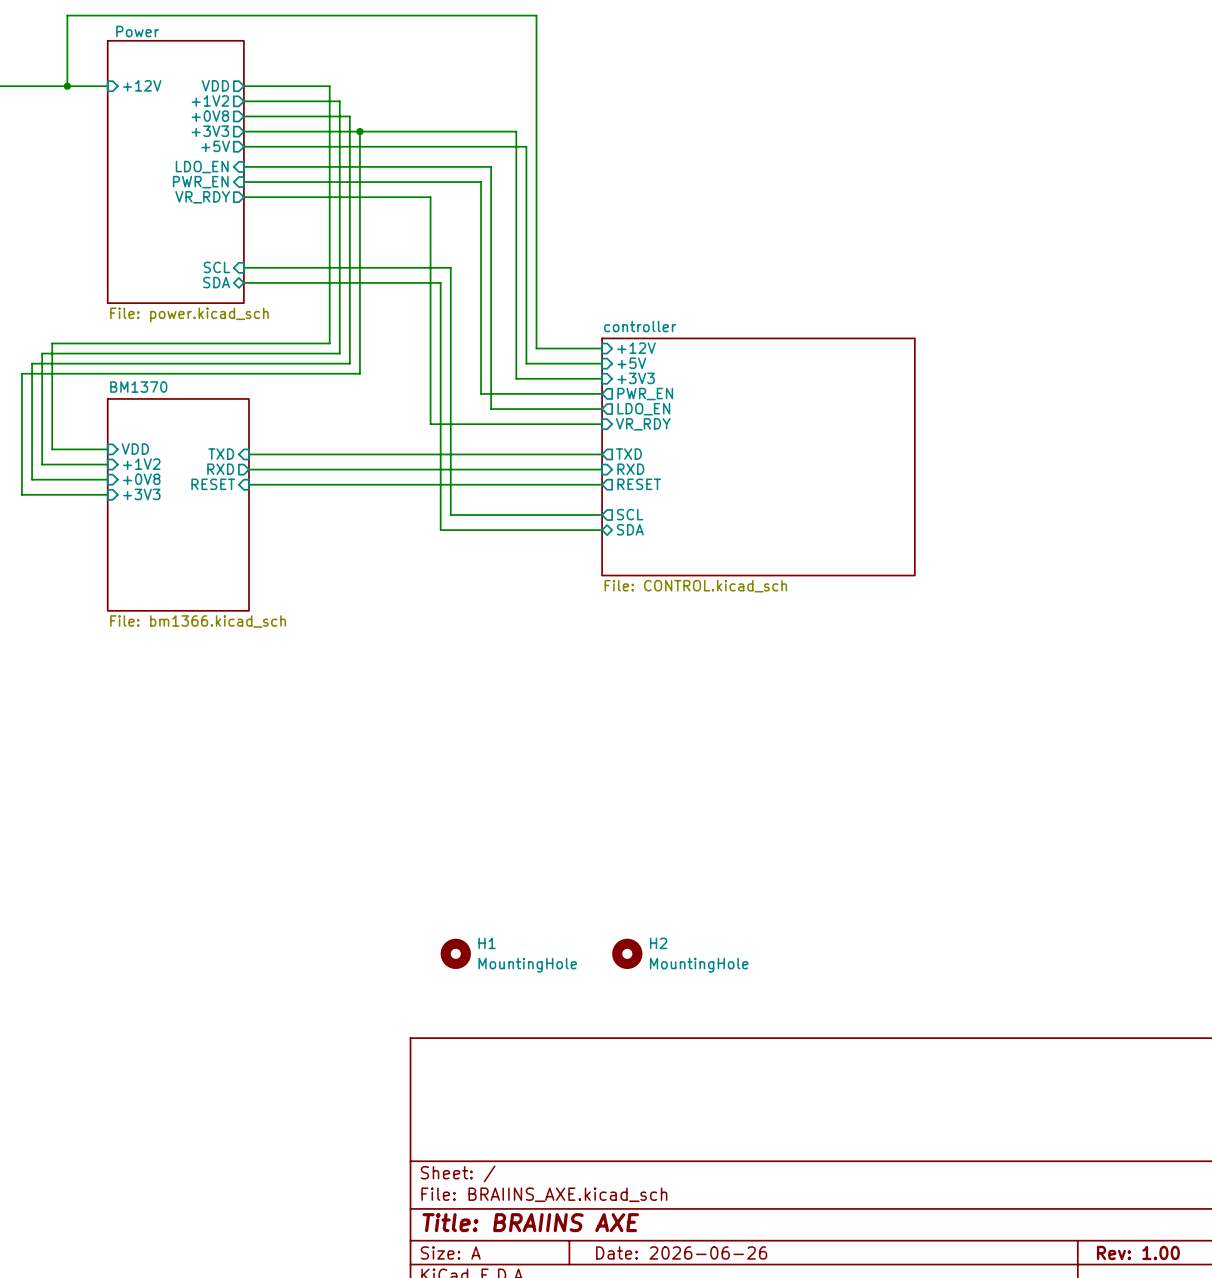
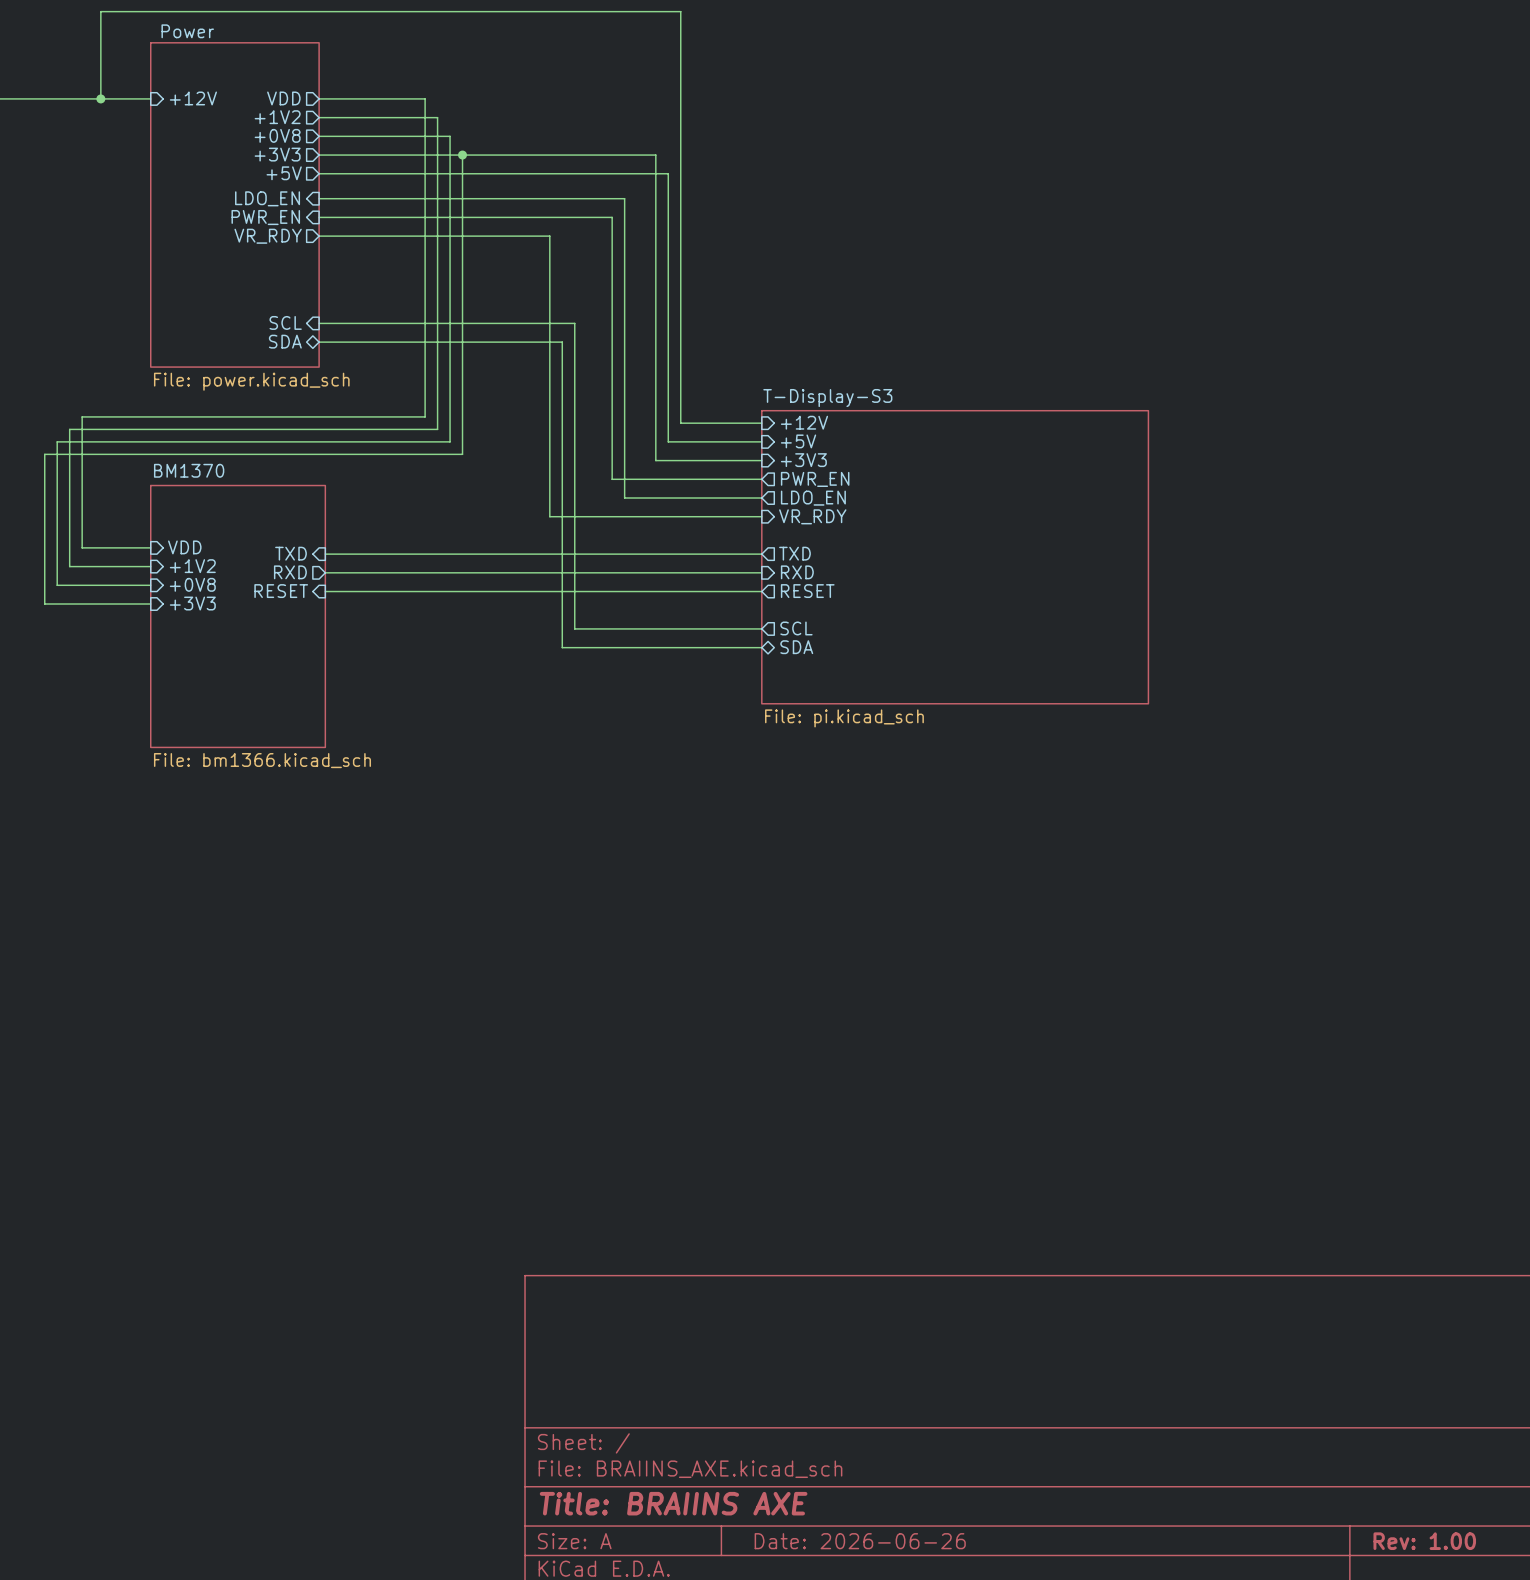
sheet controller name: controller (640, 326) -> T-Display-S3 (827, 398)
sheet controller value: File: CONTROL.kicad_sch (695, 586) -> File: pi.kicad_sch (844, 718)
H1: MountingHole (455, 953) -> none
H2: MountingHole (627, 953) -> none

